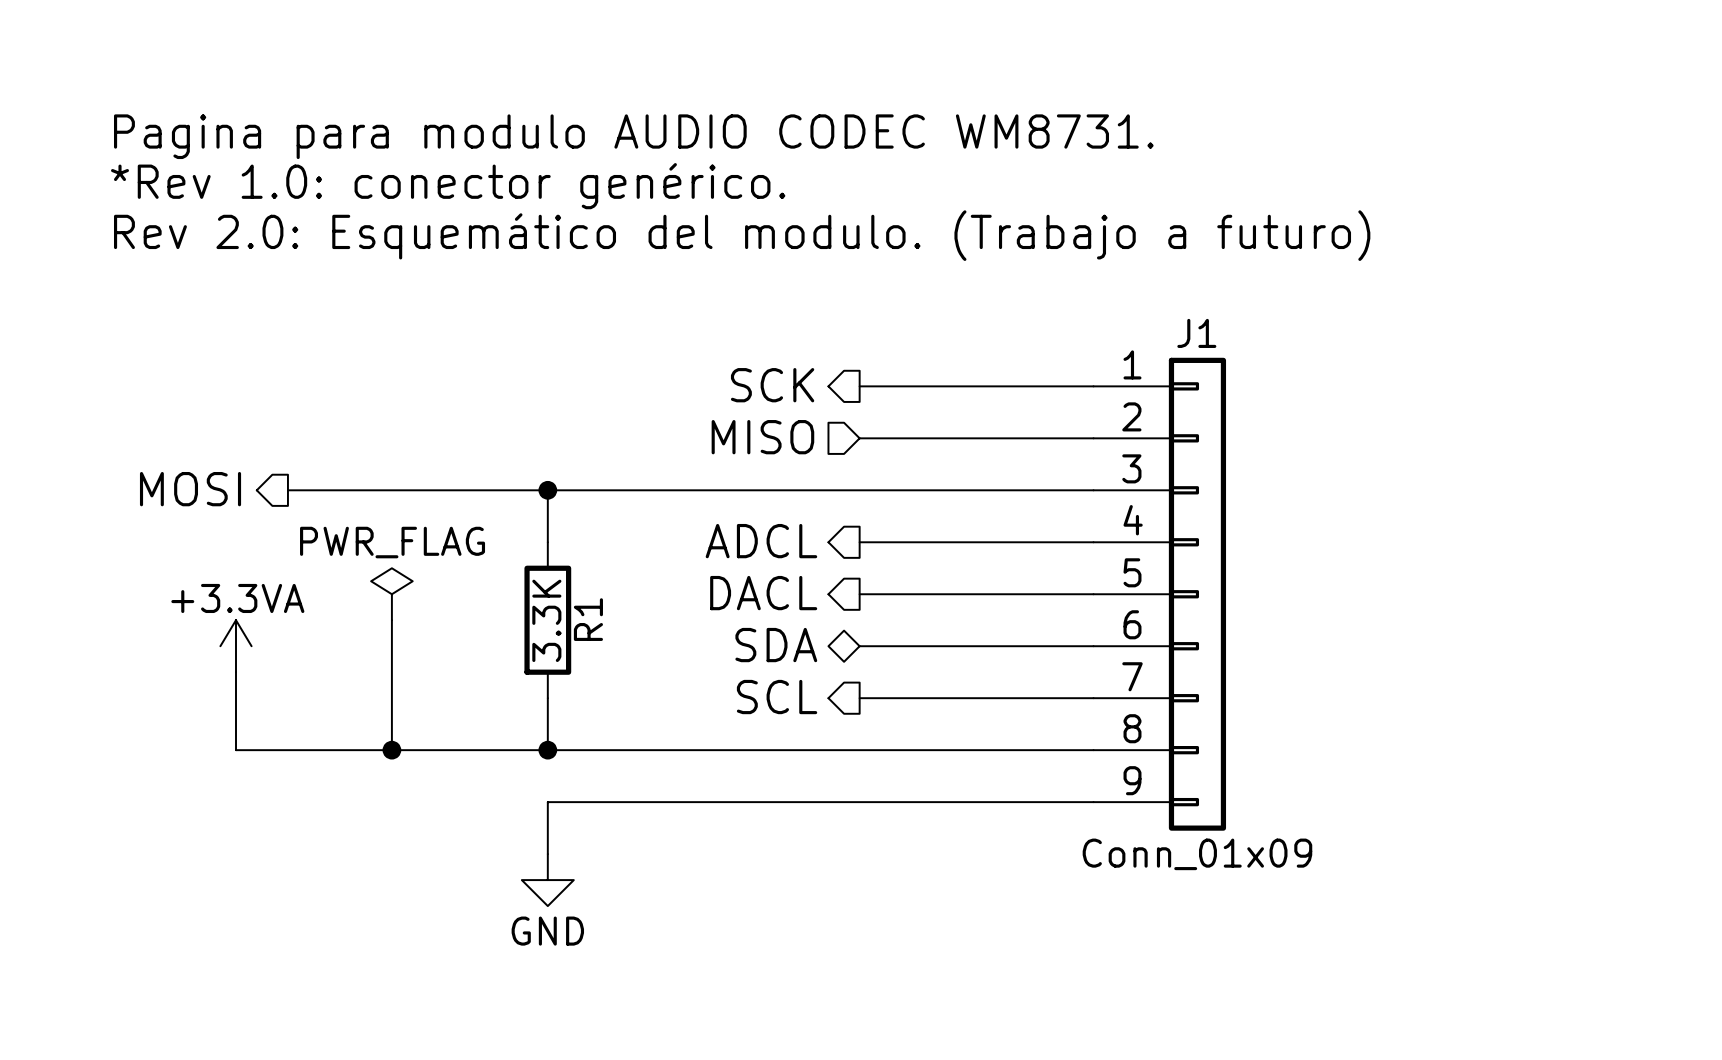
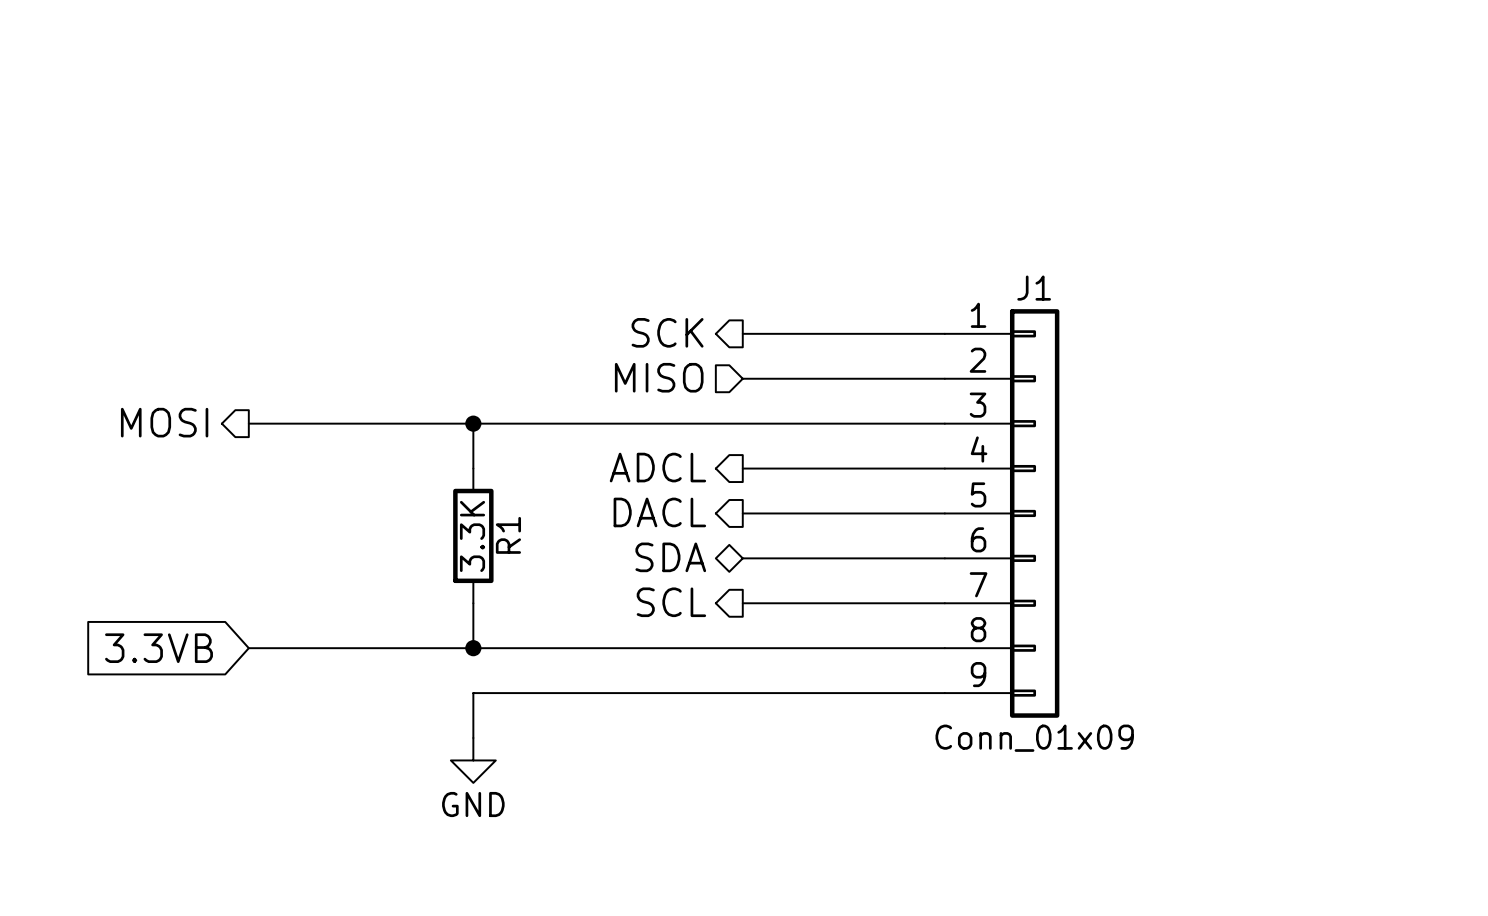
text: Pagina para modulo AUDIO CODEC WM8731. (633, 136) -> none
text: *Rev 1.0: conector genérico. (448, 186) -> none
text: Rev 2.0: Esquemático del modulo. (Trabajo a futuro) (742, 235) -> none
power symbol: PWR_FLAG (391, 594) -> none
wire: (391, 620) (391, 750) -> none
power symbol: +3.3VA (236, 646) -> none
wire: (236, 672) (236, 750) (287, 750) -> none
global label: none -> 3.3VB (159, 648)
junction: (391, 750) -> none

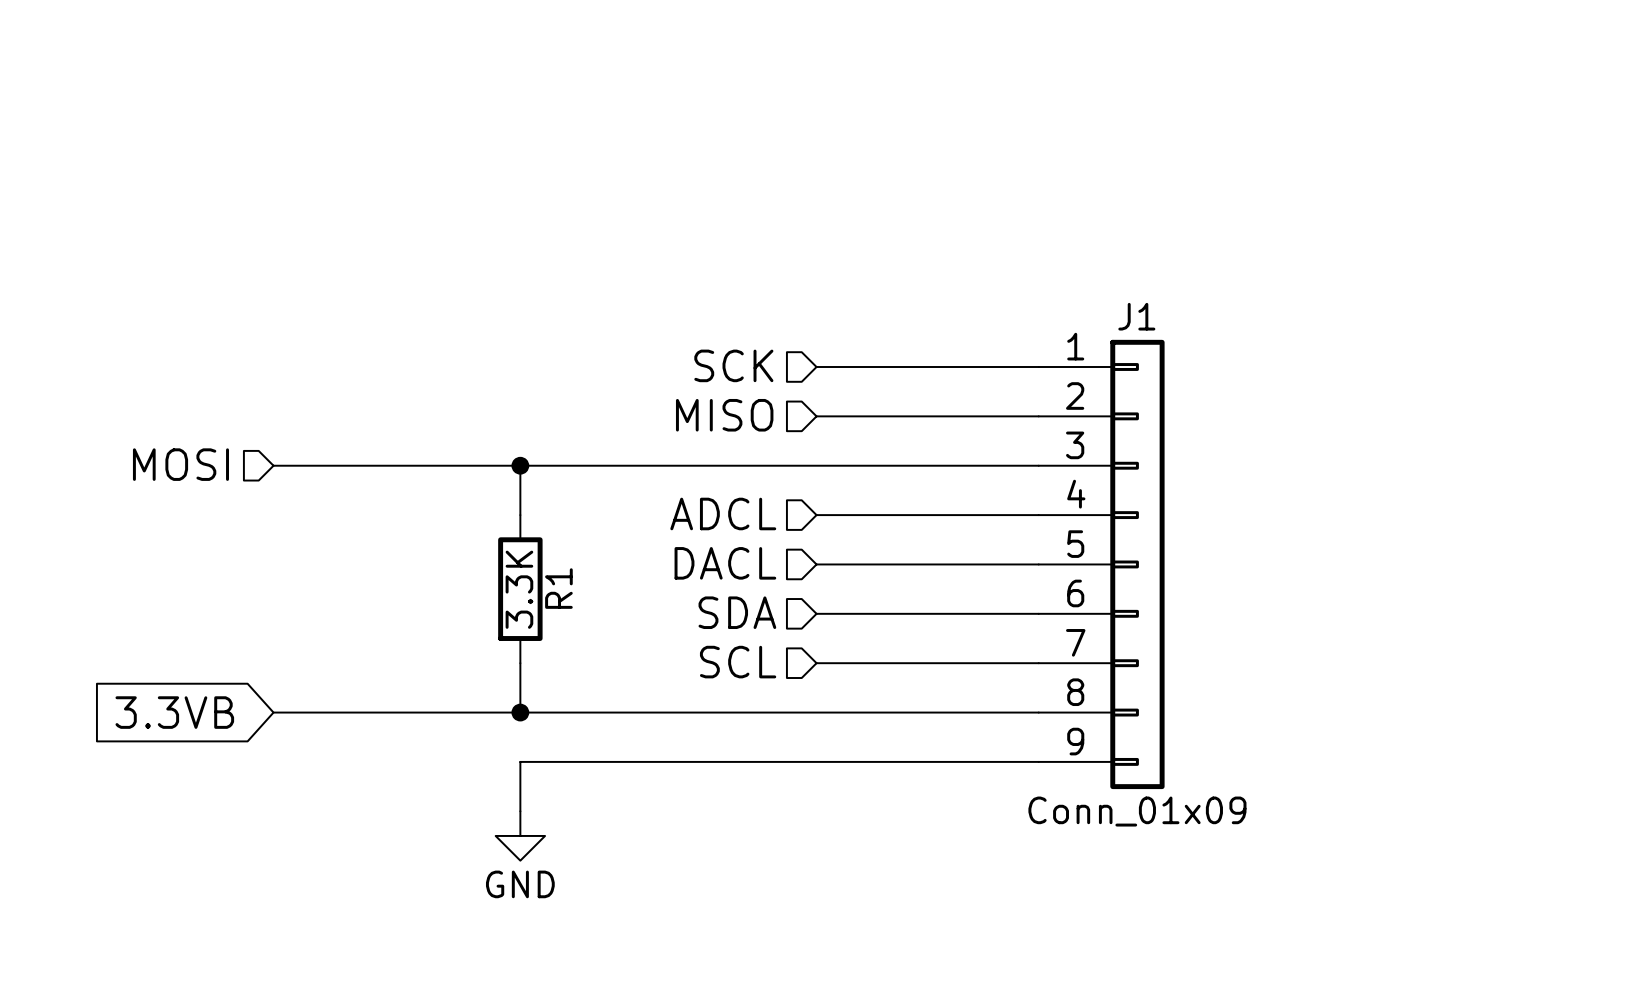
hierarchical label shape: output (667, 332) -> input (733, 365)
hierarchical label shape: output (164, 422) -> input (180, 464)
hierarchical label shape: output (657, 467) -> input (723, 513)
hierarchical label shape: output (659, 512) -> input (725, 563)
hierarchical label shape: bidirectional (670, 557) -> input (737, 612)
hierarchical label shape: output (671, 602) -> input (738, 662)

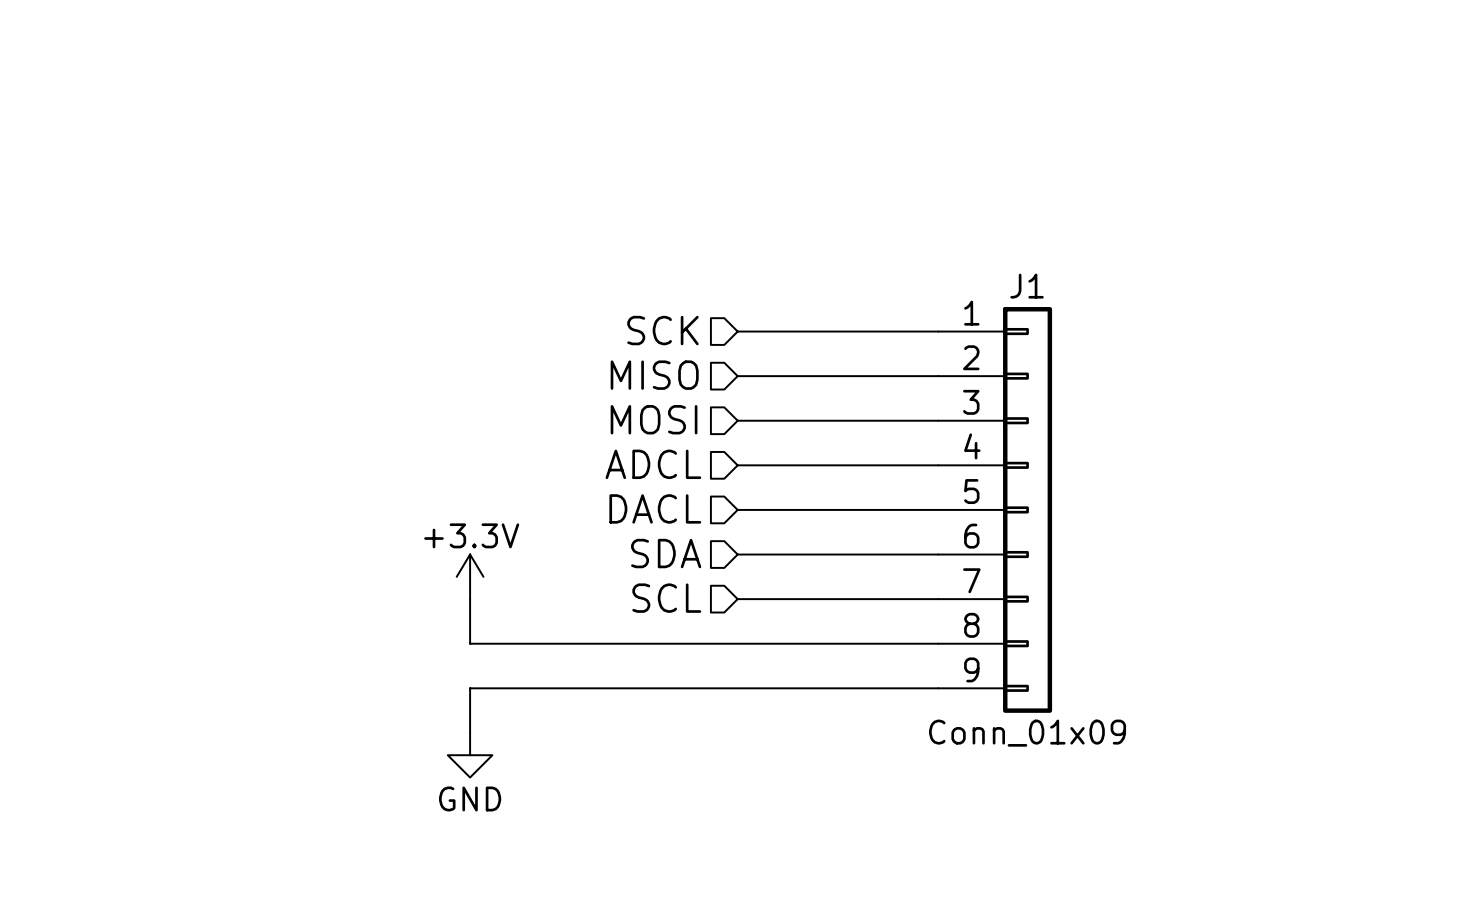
hierarchical label: MOSI (180, 464) -> none
hierarchical label: none -> MOSI (654, 419)
wire: (273, 465) (816, 465) -> none
wire: (520, 465) (520, 515) -> none
junction: (520, 465) -> none
R1: 3.3K (520, 589) -> none
power symbol: none -> +3.3V (470, 576)
global label: 3.3VB (174, 712) -> none
wire: (273, 712) (520, 712) -> none
junction: (520, 712) -> none

